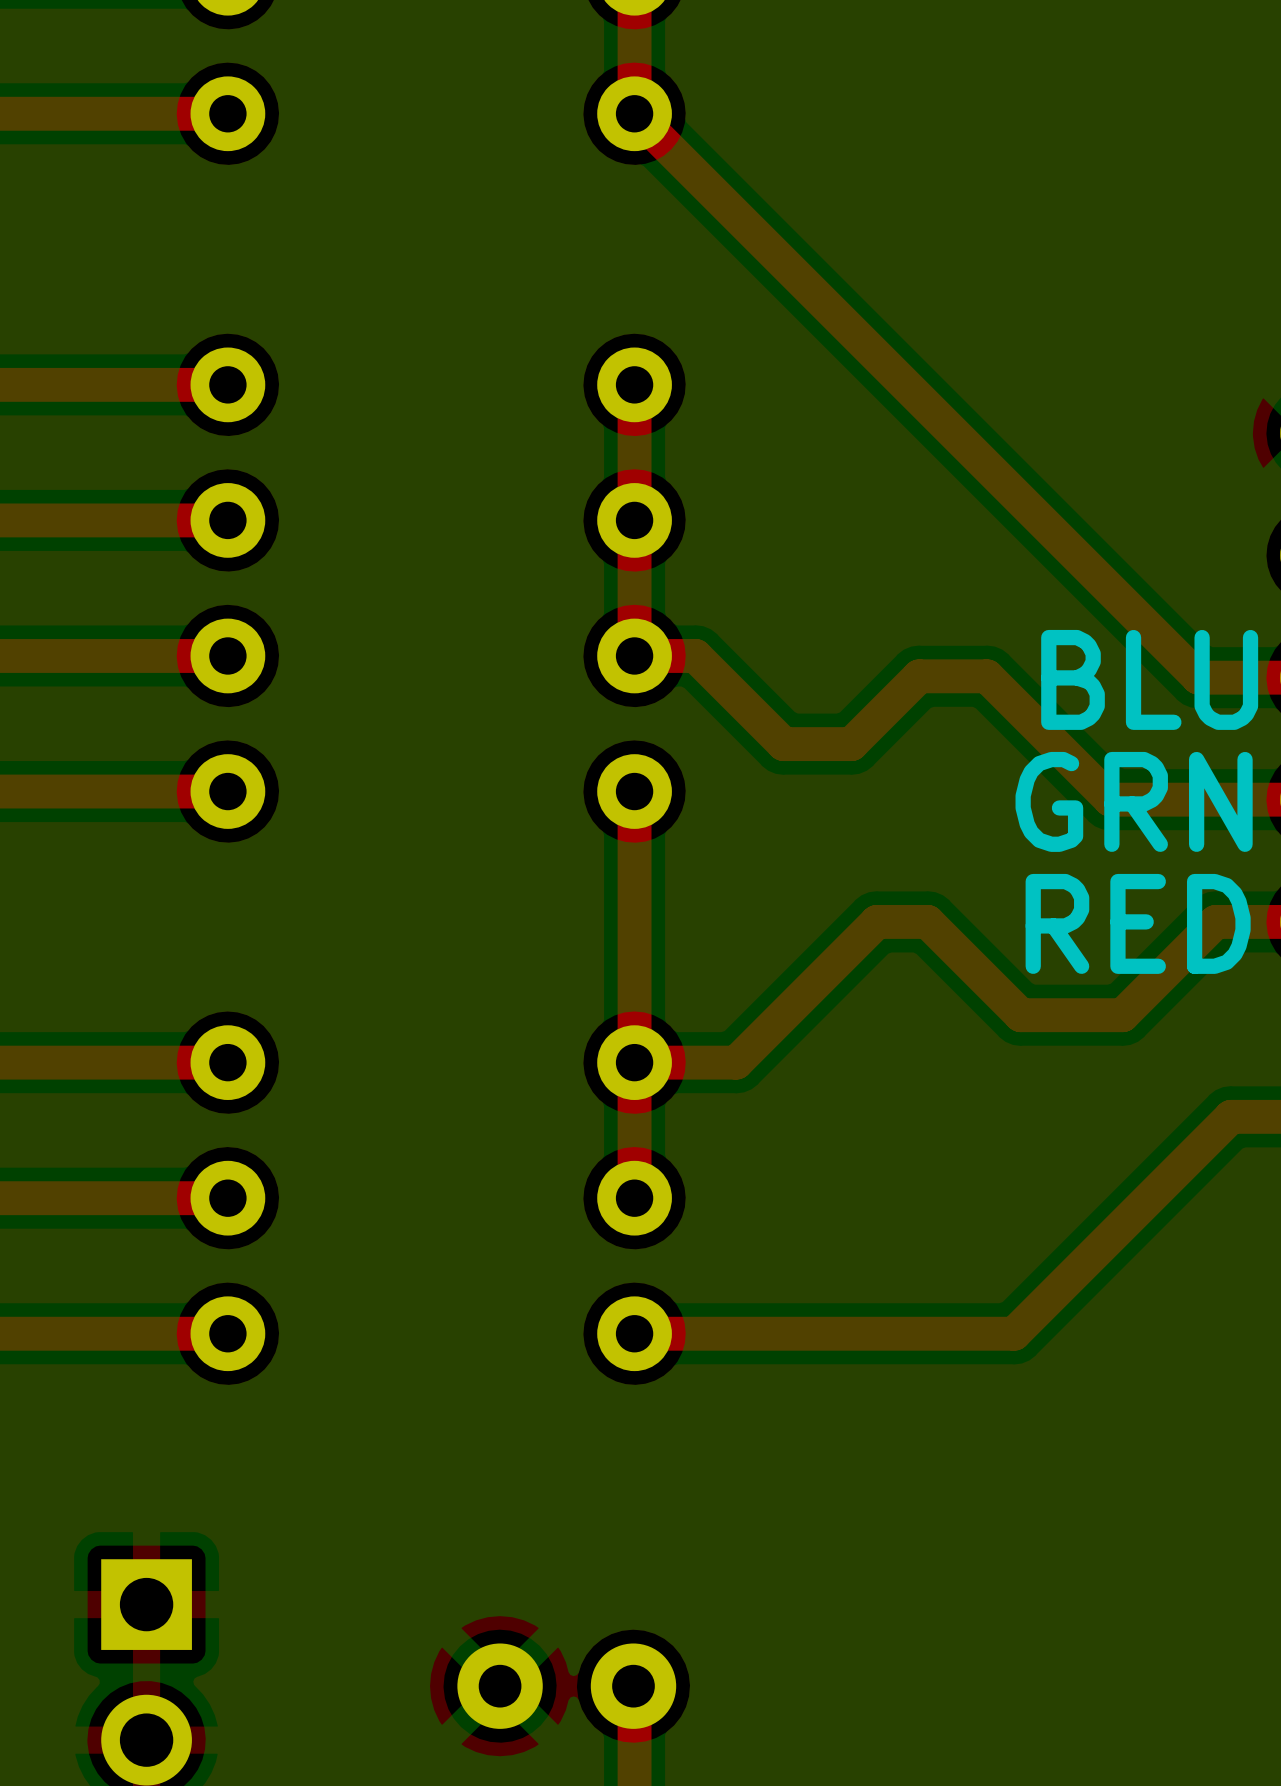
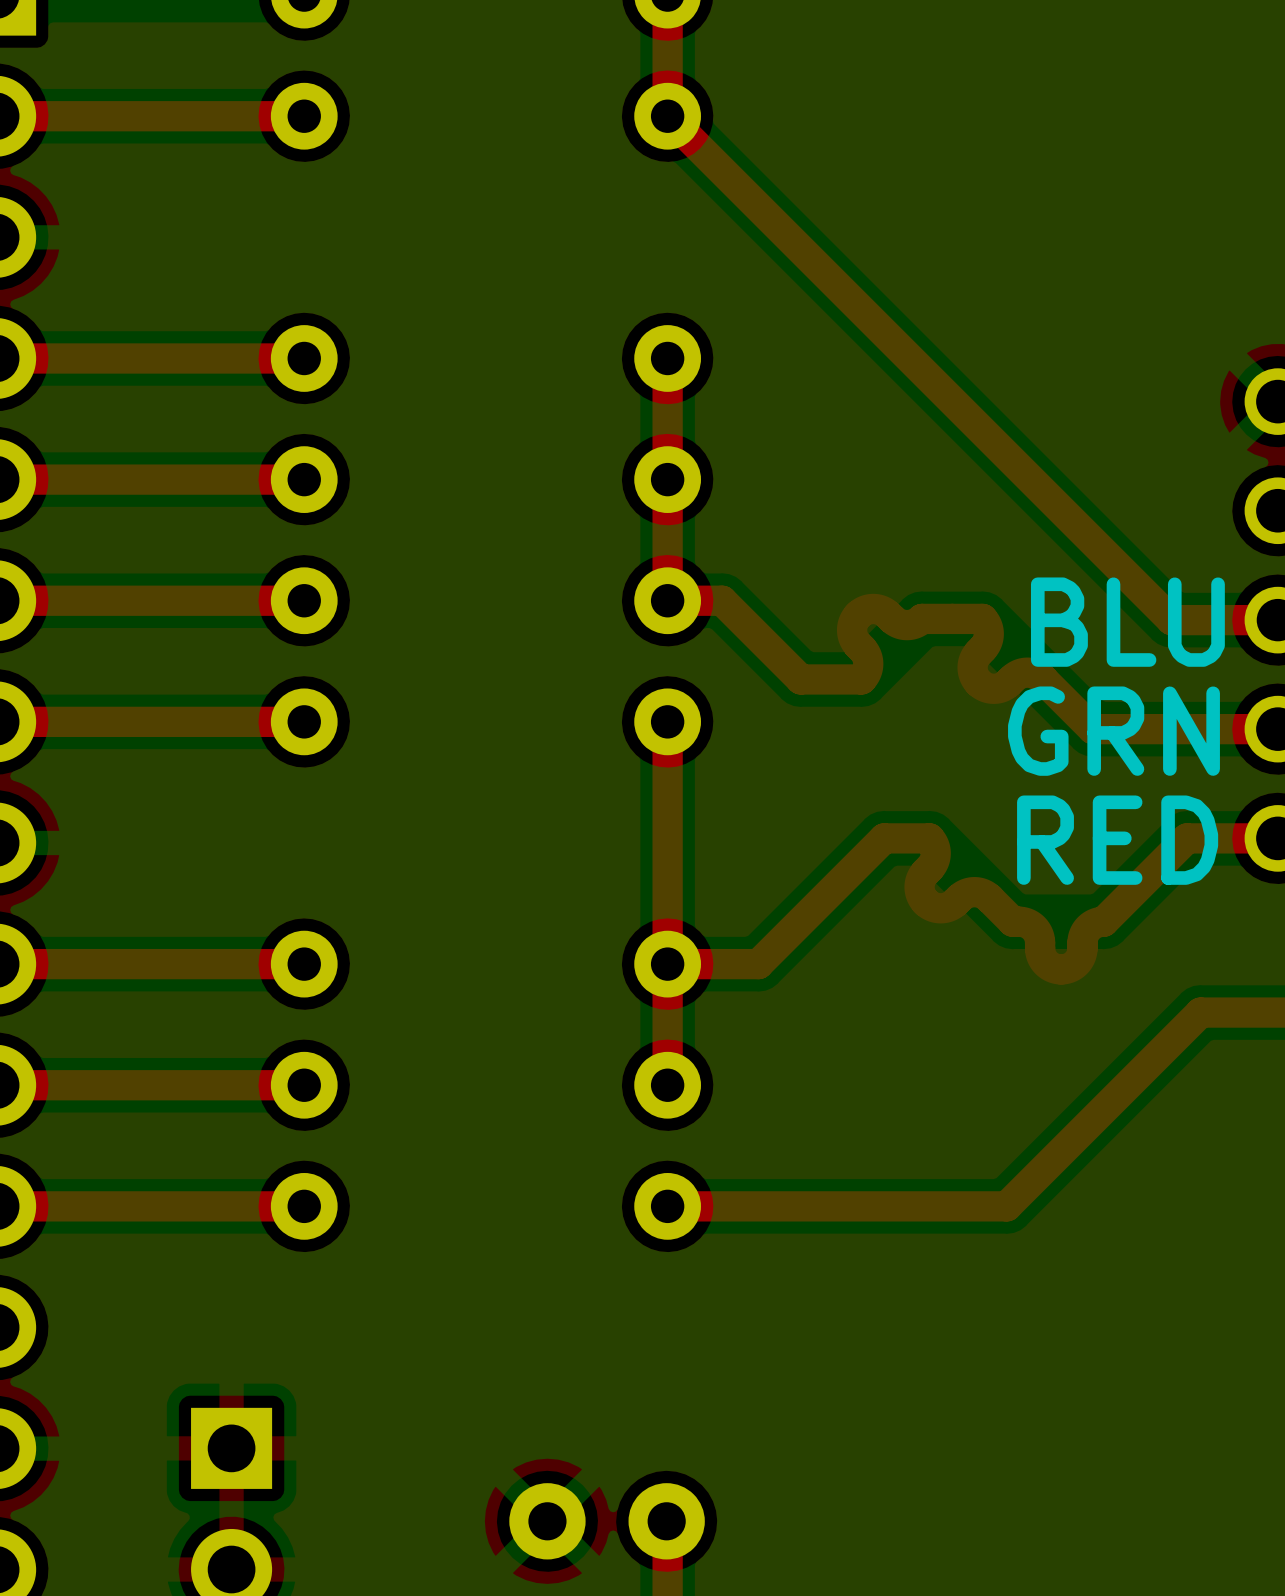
top track: (919, 676) (852, 743) -> (922, 618) (914, 623) (904, 624) (895, 621) (878, 609) (867, 609) (858, 615) (853, 623) (852, 632) (855, 641) (867, 658) (867, 669) (862, 678)
top track: (987, 676) (1054, 743) -> (982, 618) (988, 628) (988, 639) (975, 657) (972, 667) (974, 675) (978, 682) (986, 687) (996, 688) (1005, 685) (1022, 673) (1033, 673) (1042, 678)
top track: (927, 921) (994, 989) -> (929, 838) (934, 845) (935, 853) (932, 863) (920, 881) (920, 892) (925, 902) (933, 907) (943, 908) (952, 905) (968, 892) (979, 892) (989, 898)
top track: (1122, 1015) (1027, 1015) -> (1103, 921) (1092, 924) (1085, 931) (1083, 938) (1081, 952) (1077, 961) (1070, 967) (1061, 969) (1052, 967) (1043, 959) (1040, 952) (1039, 938) (1035, 929) (1028, 923) (1018, 921)

